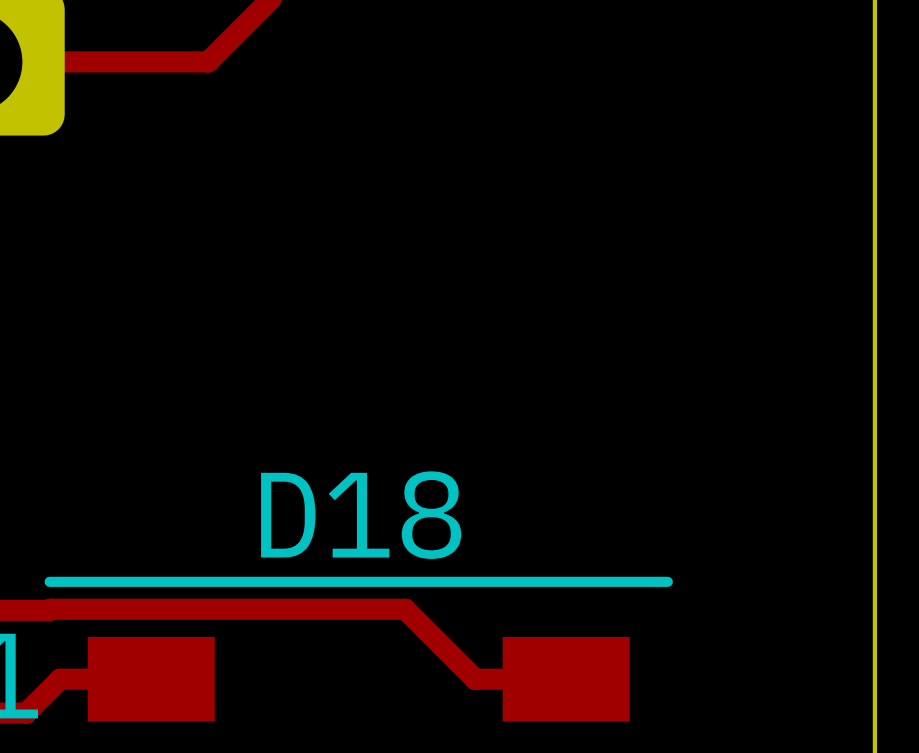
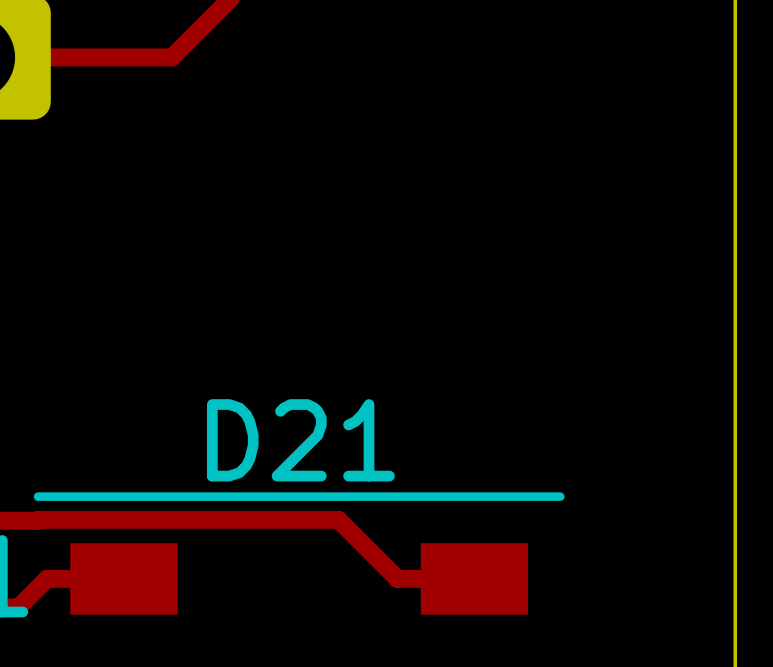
D18 name: D18 (361, 515) -> D21 (300, 440)

